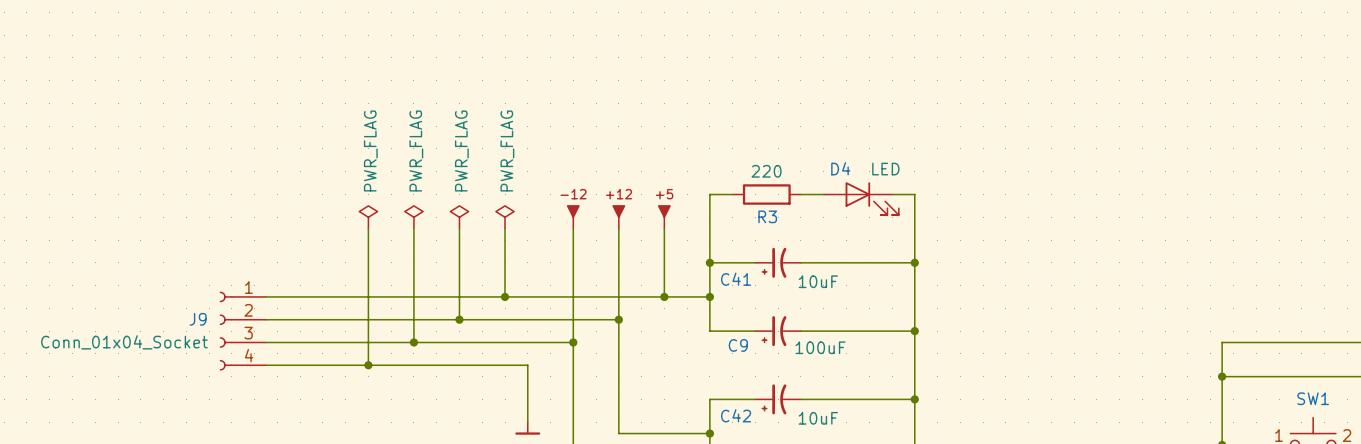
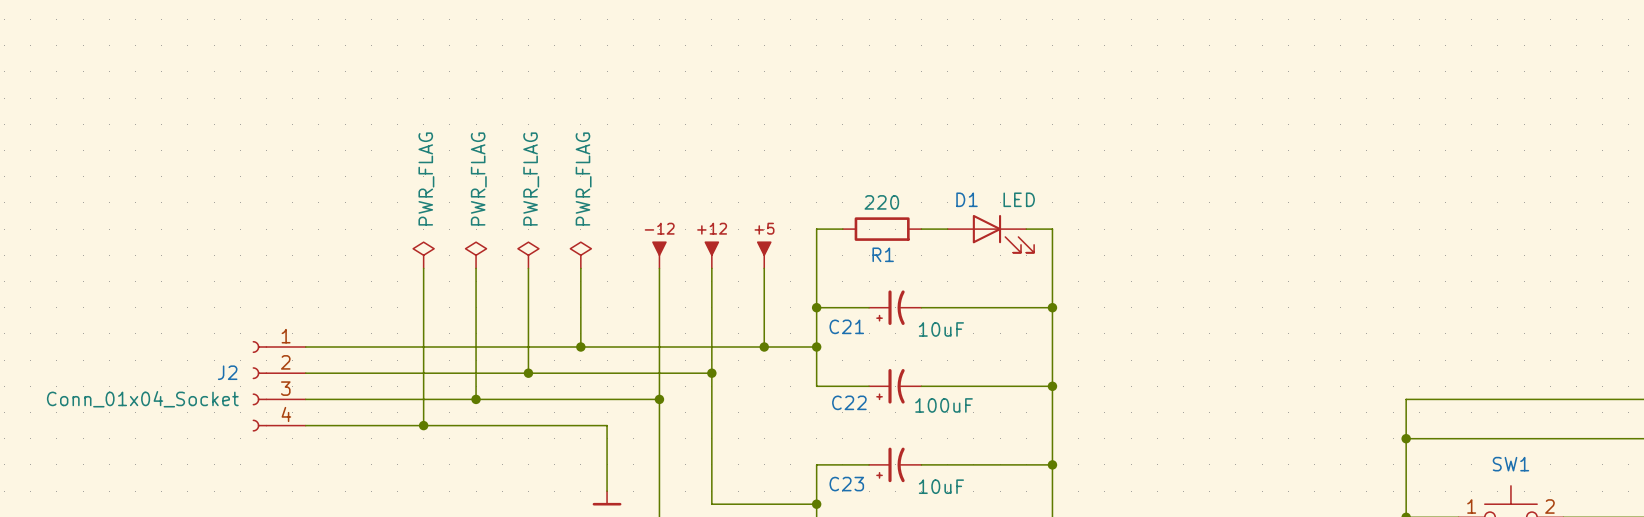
D4 name: D4 (840, 168) -> D1 (967, 199)
R3 name: R3 (767, 216) -> R1 (883, 254)
C41 name: C41 (736, 279) -> C21 (846, 326)
J9 name: J9 (198, 319) -> J2 (227, 372)
C9 name: C9 (738, 345) -> C22 (849, 402)
C42 name: C42 (736, 415) -> C23 (846, 484)

